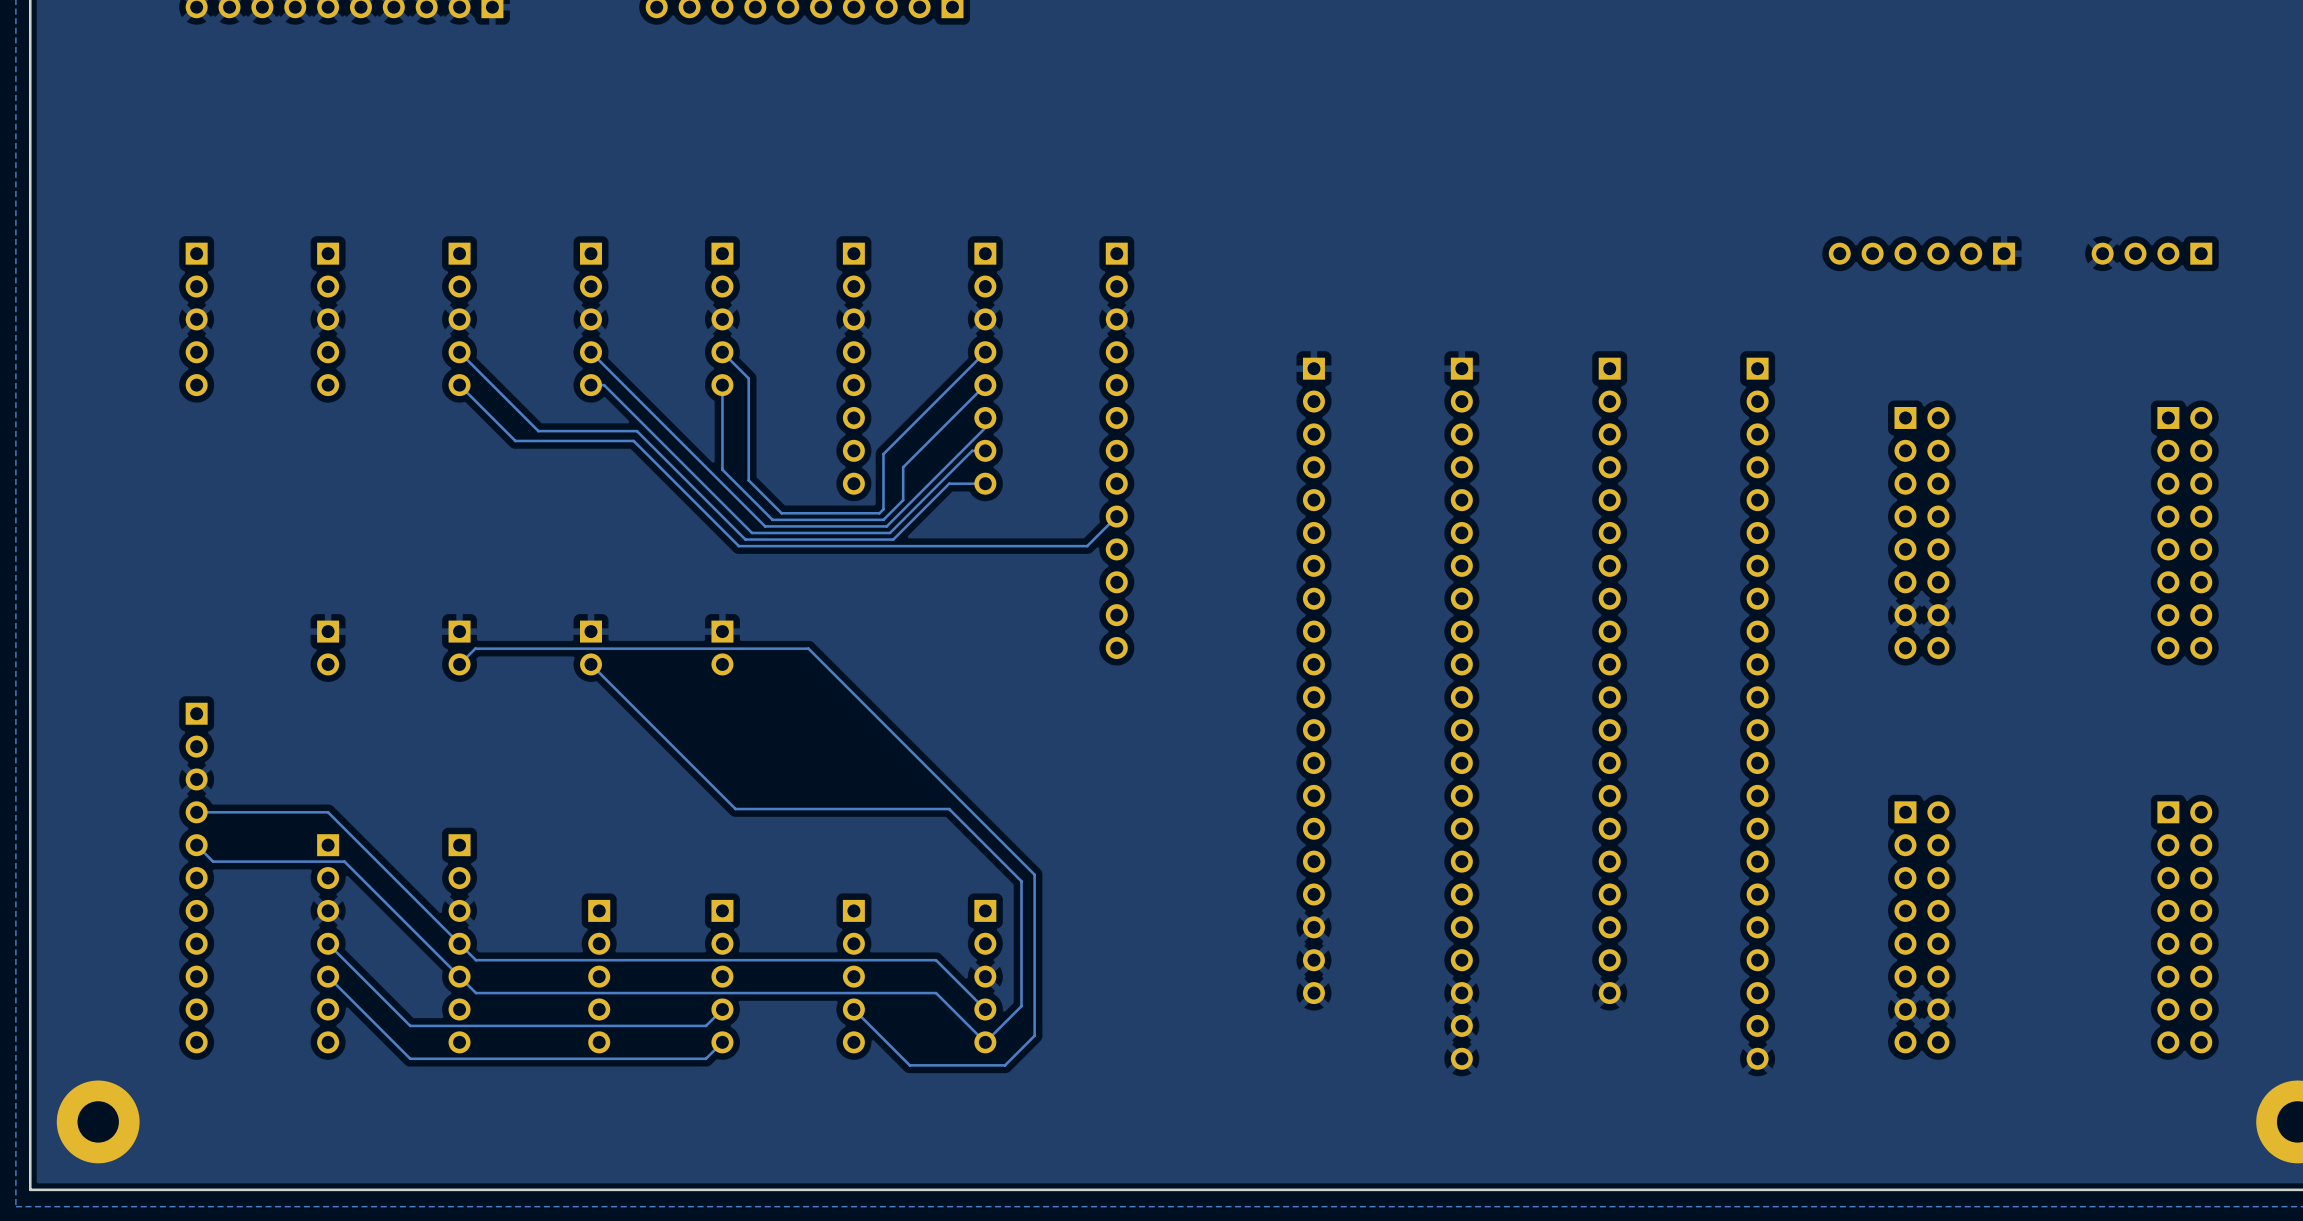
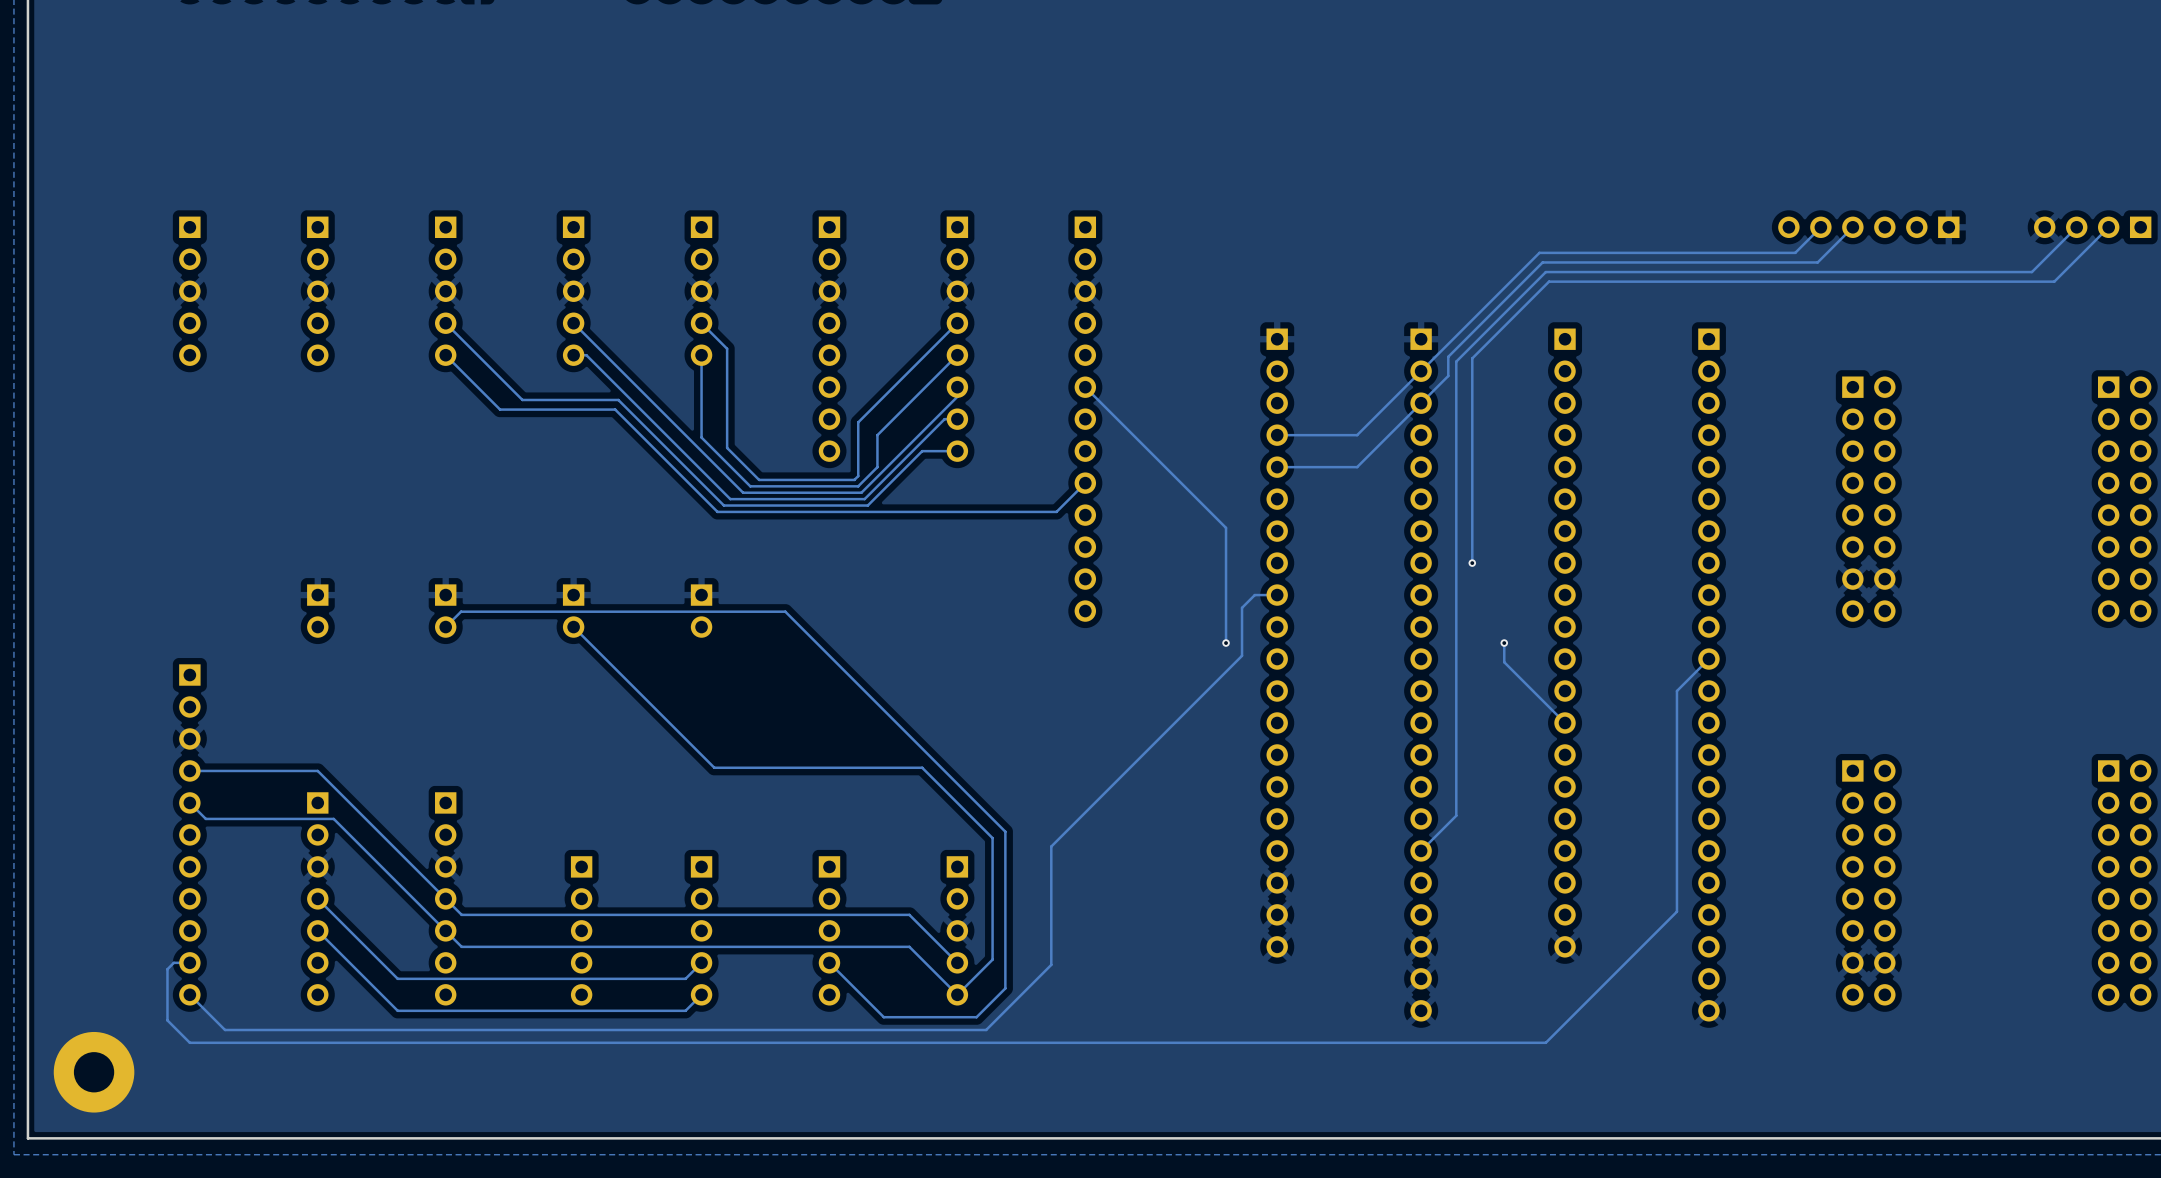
track: none -> (1820, 227) (1795, 252) (1539, 252) (1357, 435) (1277, 435)
track: none -> (1852, 227) (1817, 262) (1542, 262) (1448, 356) (1448, 376) (1357, 467) (1277, 467)
track: none -> (2076, 227) (2031, 272) (1545, 272) (1456, 361) (1456, 815) (1421, 850)
track: none -> (2108, 227) (2054, 281) (1549, 281) (1472, 358) (1472, 563)
track: none -> (1085, 387) (1226, 527) (1226, 643)
via: none -> (1472, 563)
track: none -> (1277, 595) (1254, 595) (1242, 607) (1242, 655) (1051, 846) (1051, 964) (986, 1030) (225, 1030) (189, 994)
via: none -> (1226, 643)
track: none -> (1504, 643) (1504, 662) (1565, 722)
via: none -> (1504, 643)
track: none -> (1708, 659) (1676, 691) (1676, 911) (1545, 1042) (189, 1042) (167, 1020) (167, 969) (173, 962) (189, 962)

